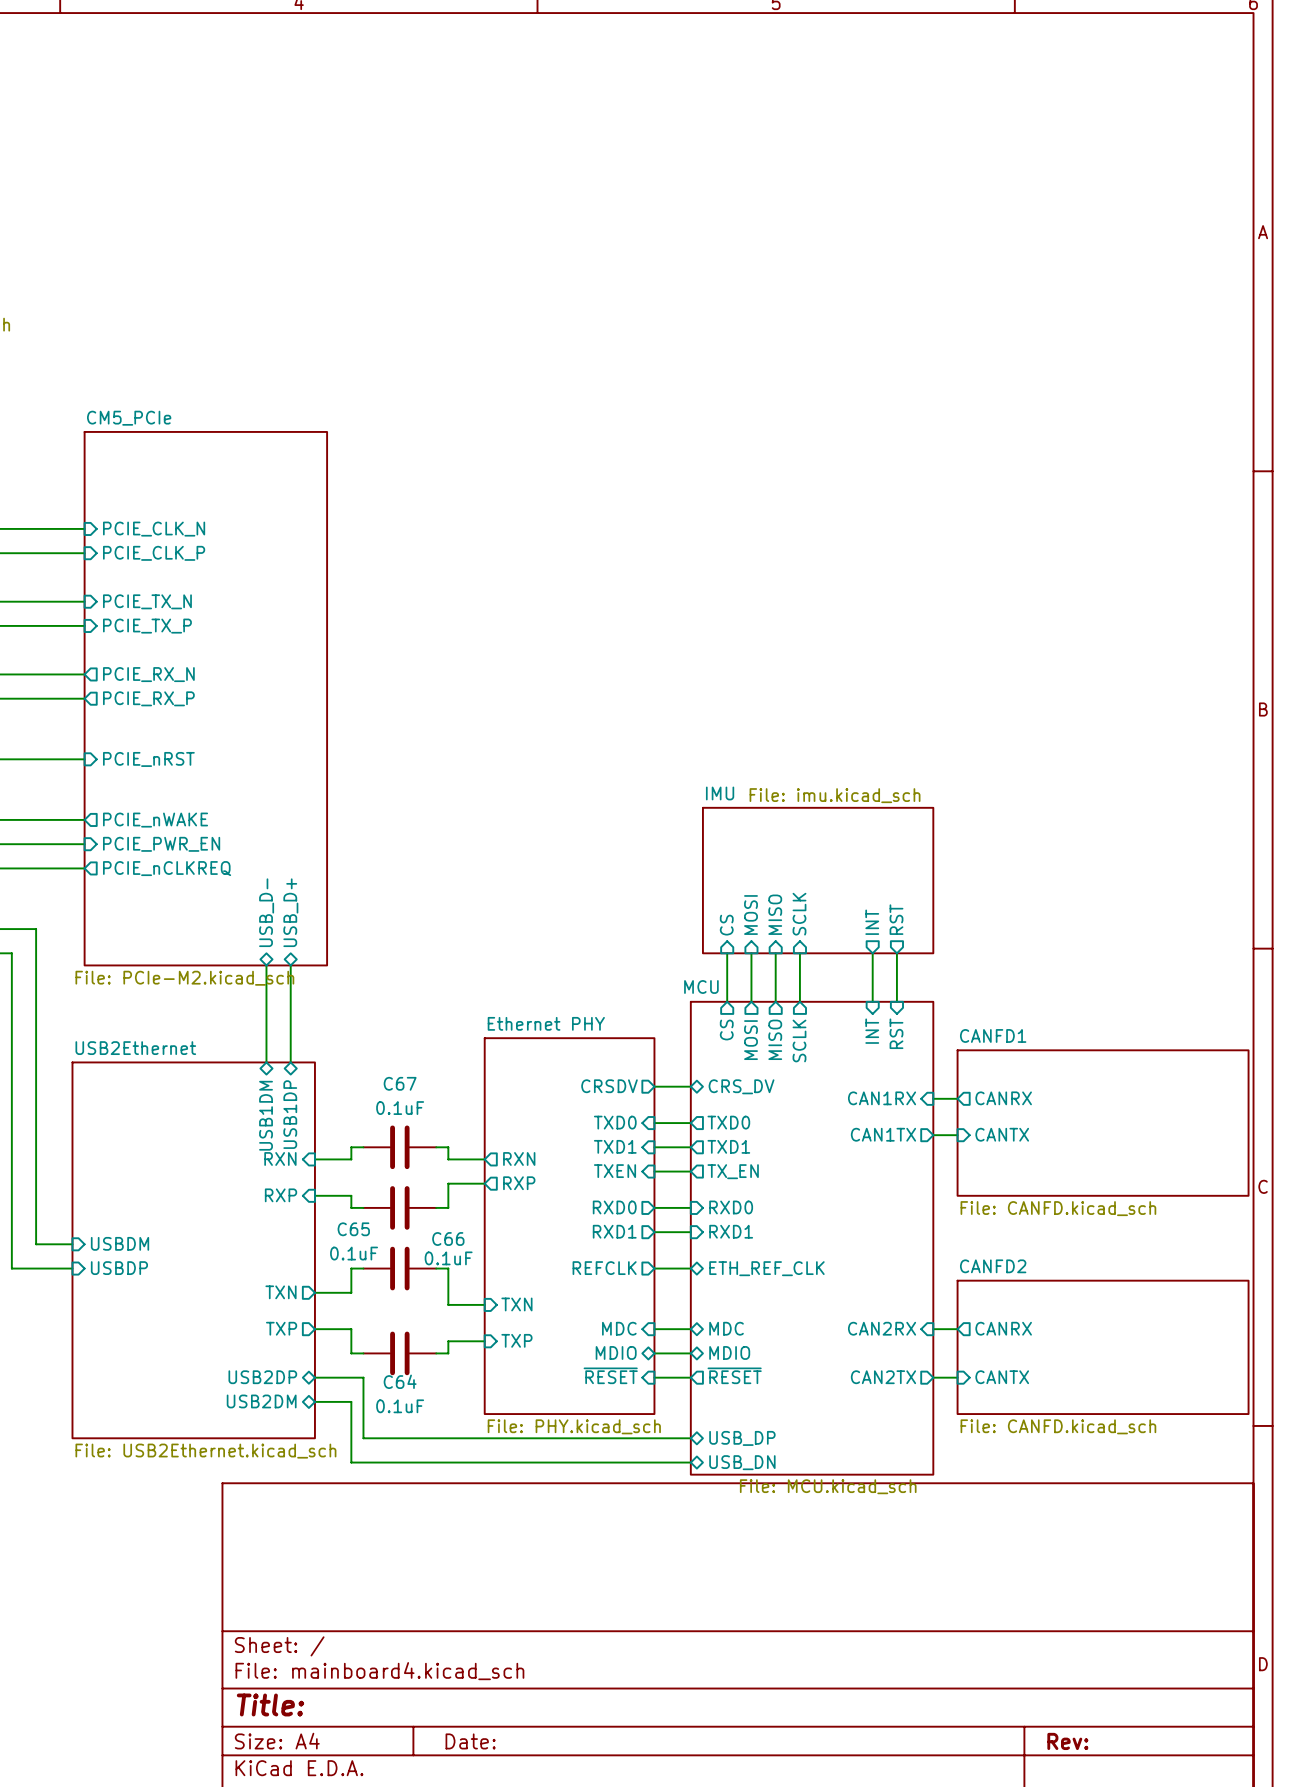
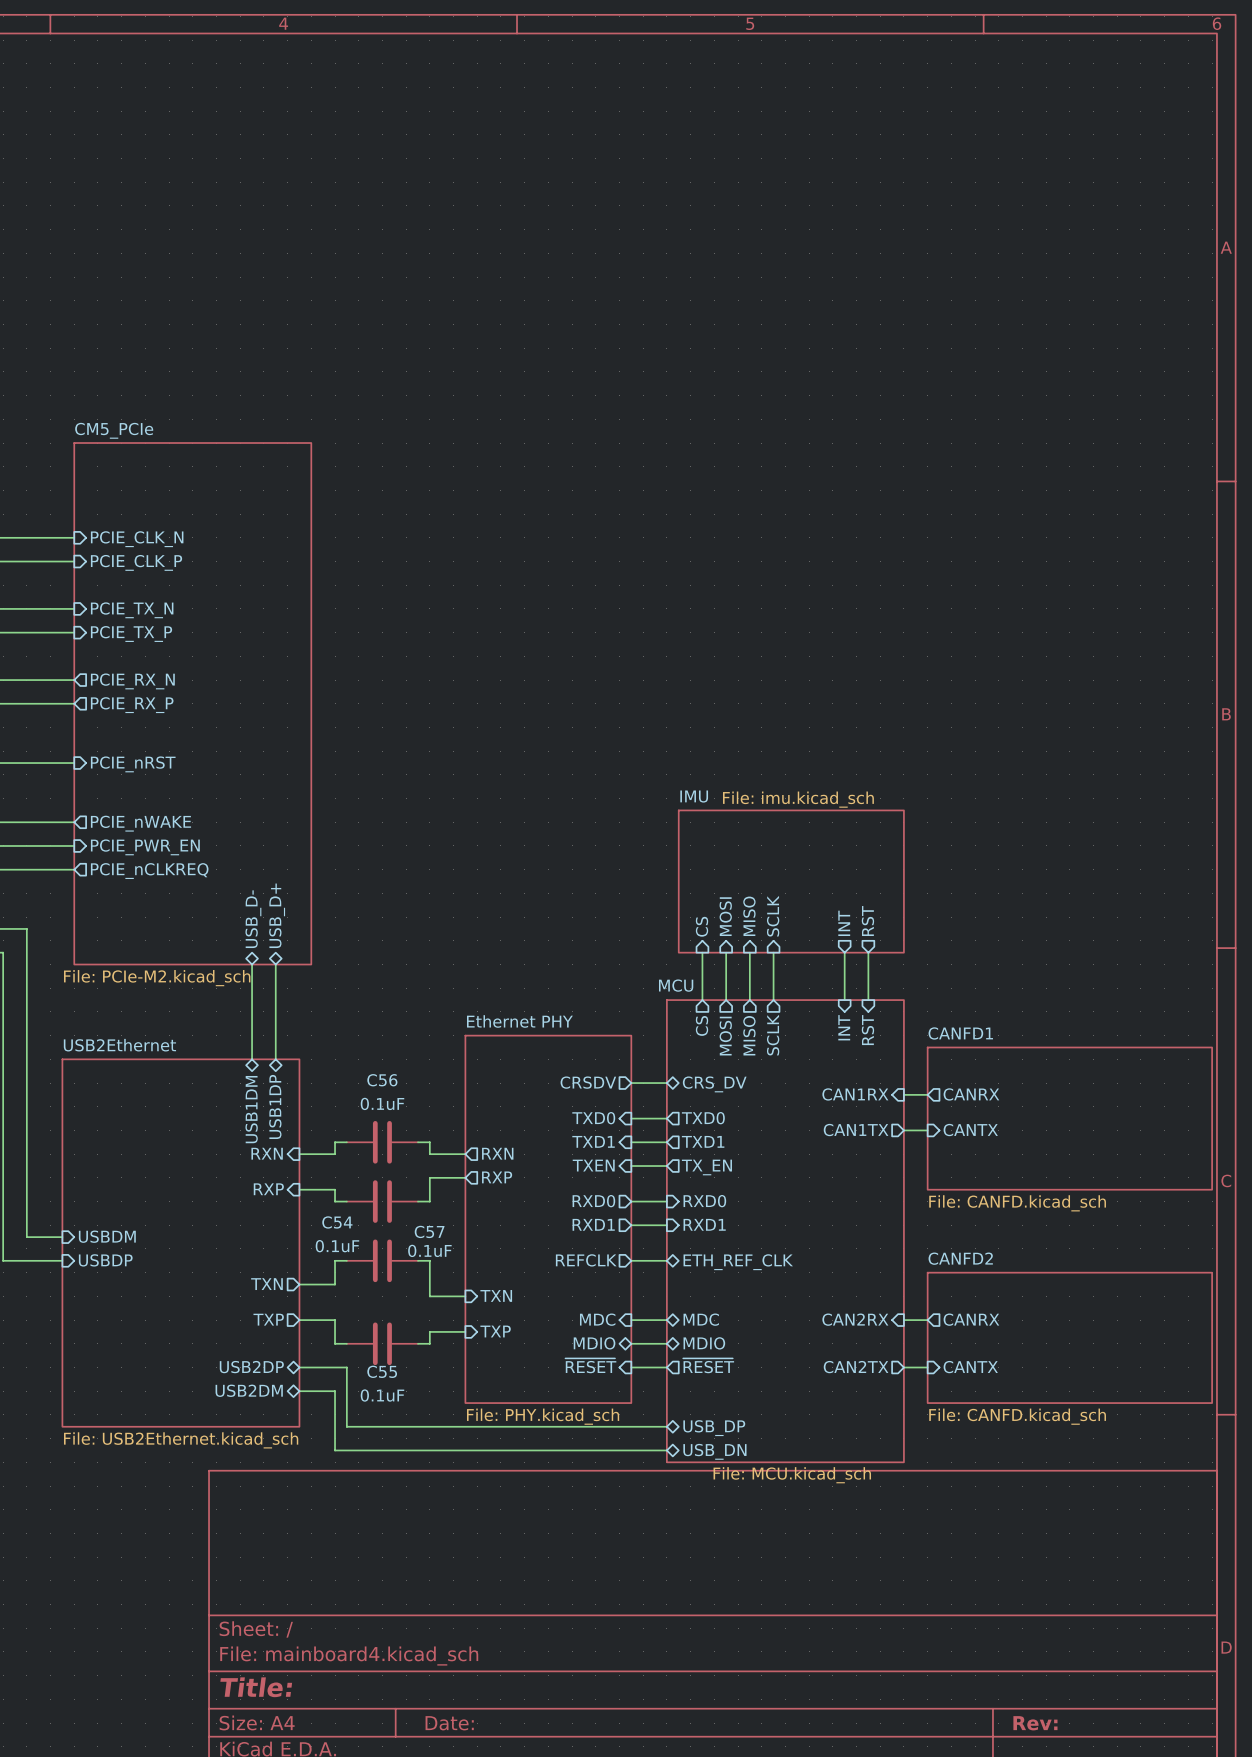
C67 name: C67 (400, 1083) -> C56 (382, 1080)
C65 name: C65 (353, 1229) -> C54 (337, 1222)
C66 name: C66 (448, 1239) -> C57 (429, 1231)
C64 name: C64 (400, 1381) -> C55 (382, 1371)

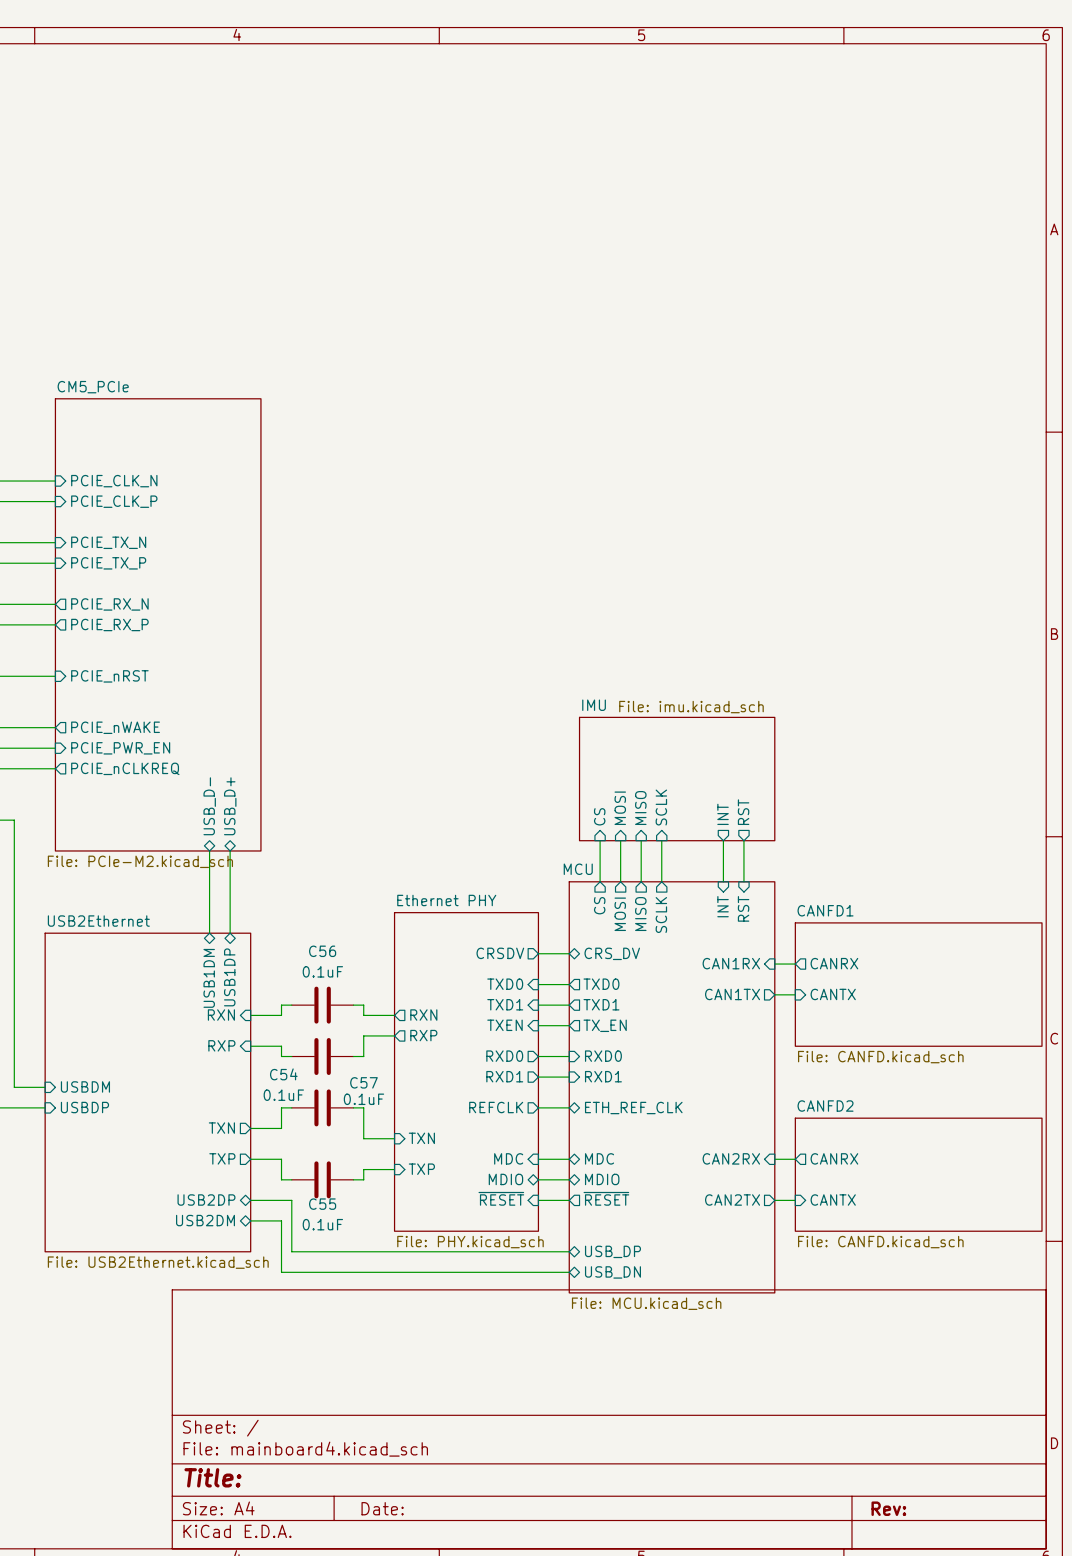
sheet MCU shape: [666, 999, 905, 1464] -> [568, 881, 776, 1294]
sheet MCU value position: File: MCU.kicad_sch (792, 1475) -> File: MCU.kicad_sch (646, 1303)

